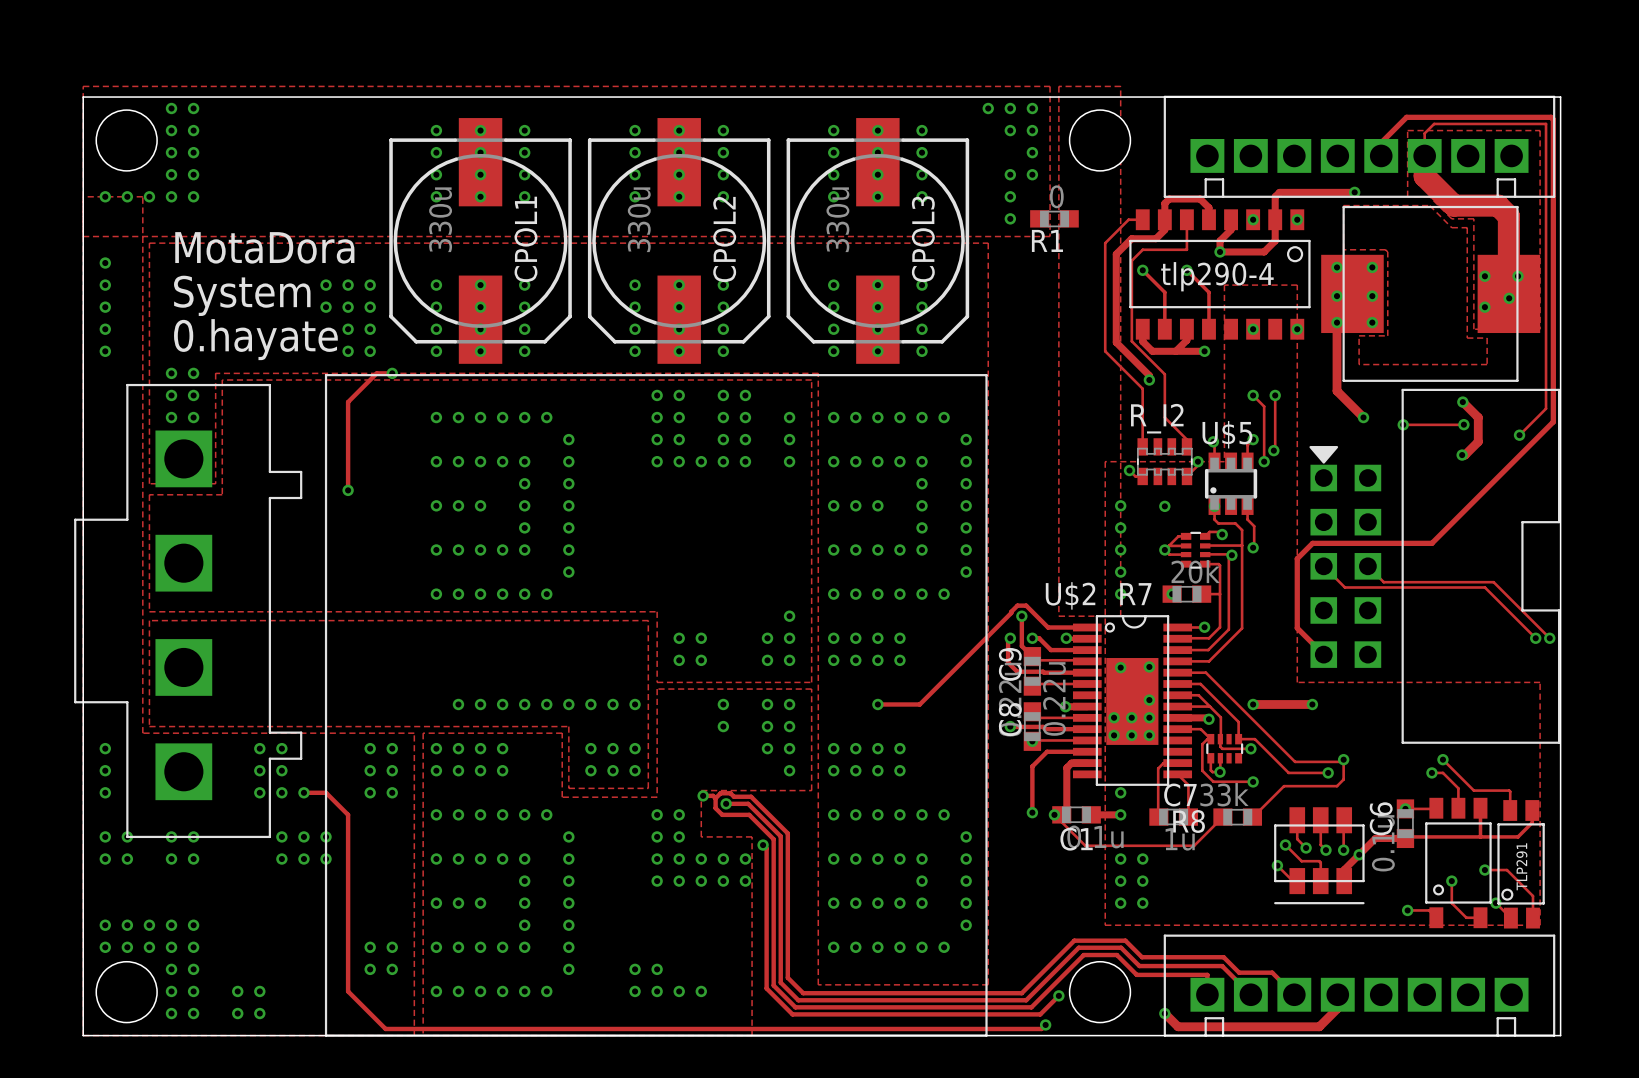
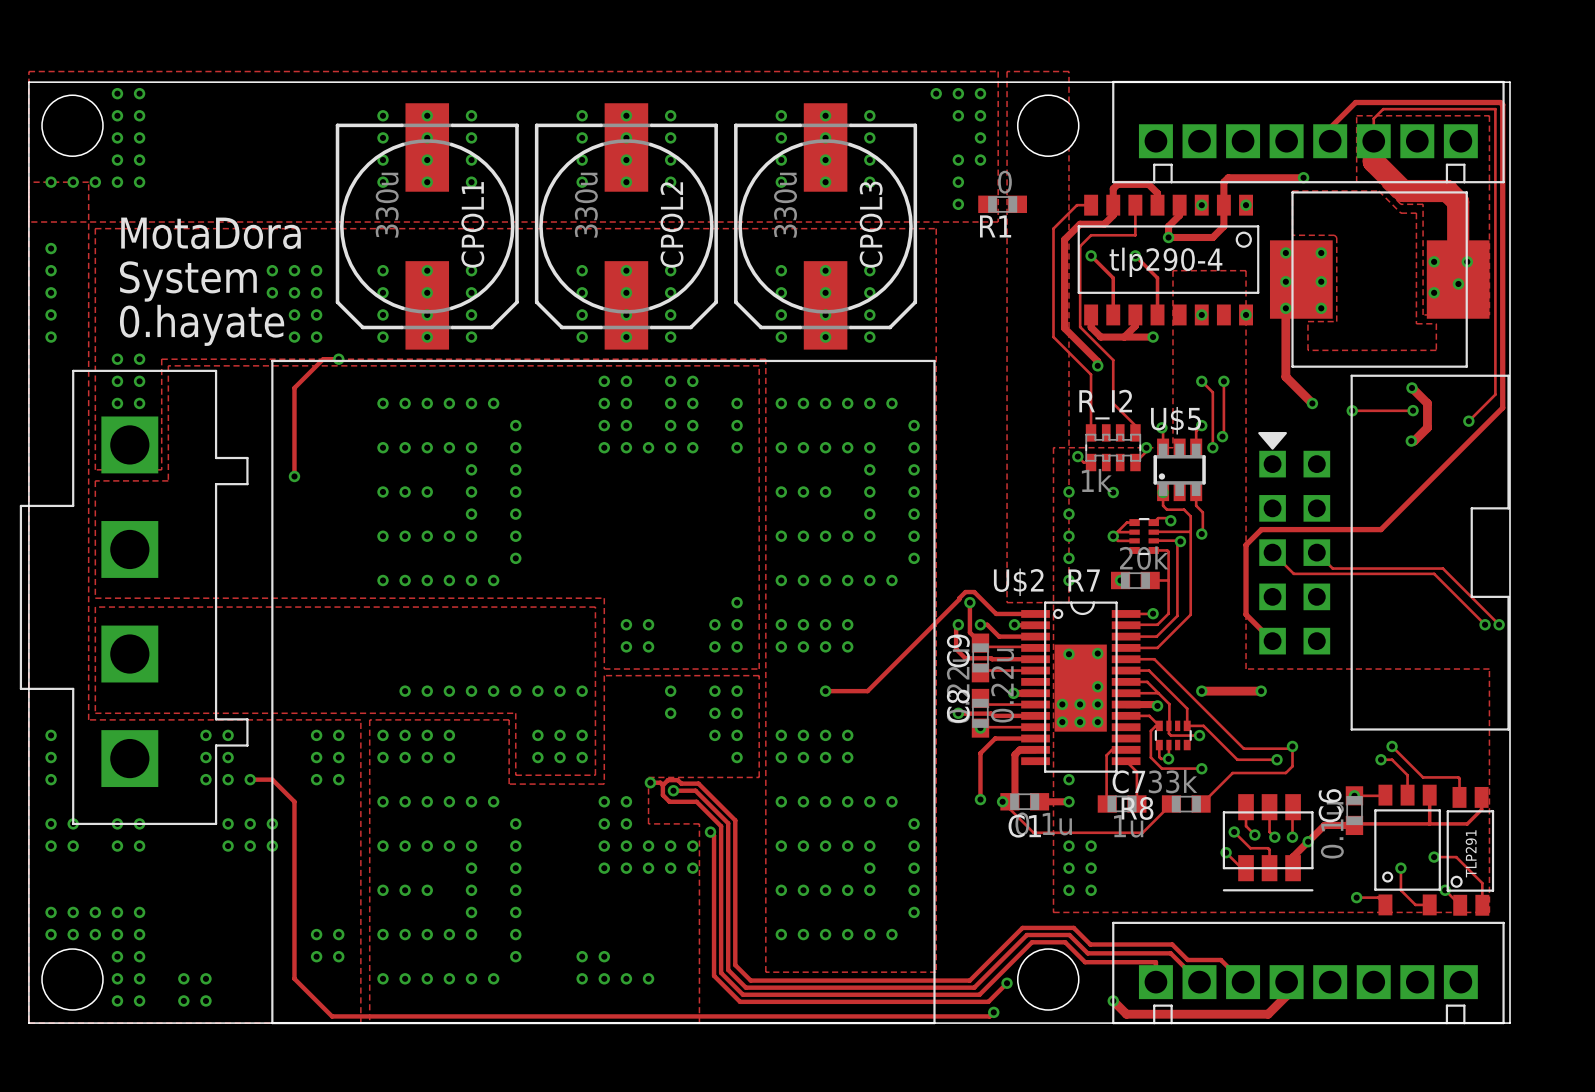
R_I2 value: none -> 1k (1096, 480)

